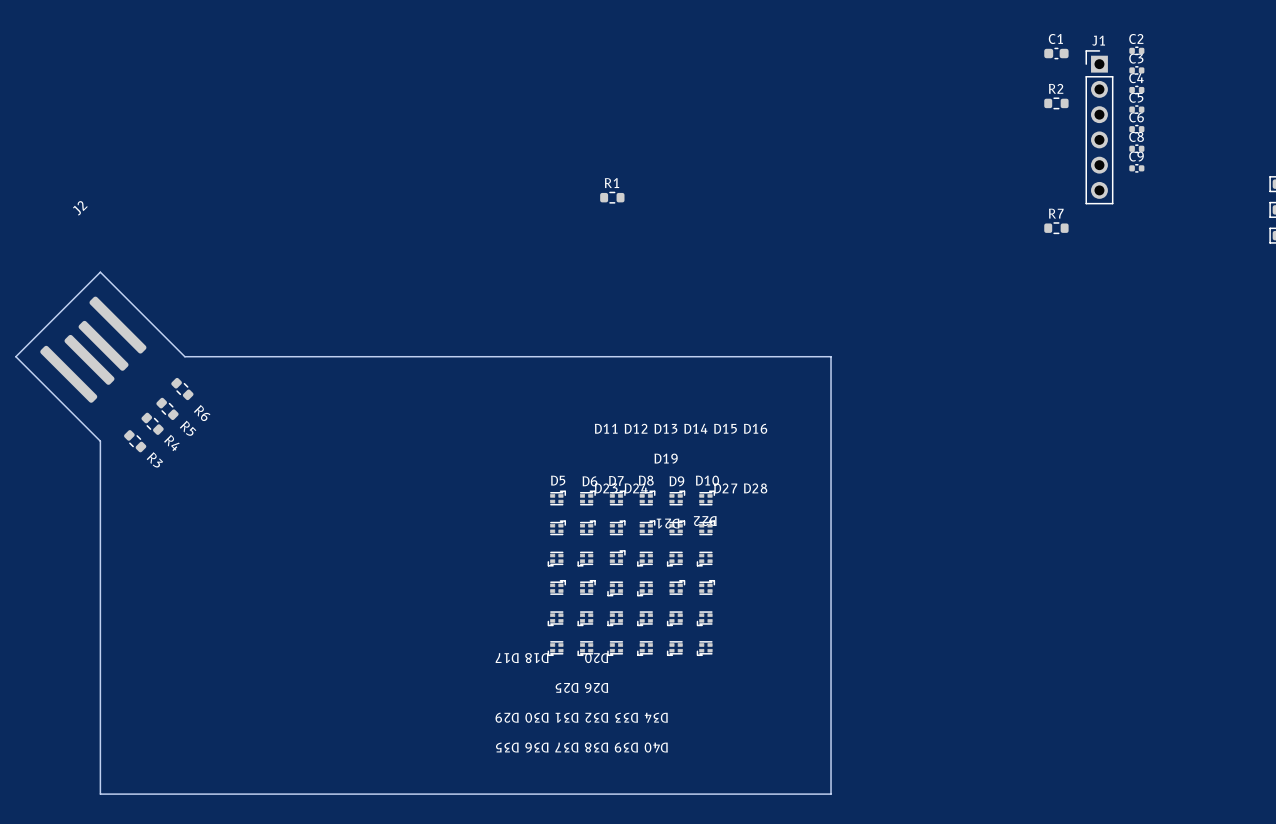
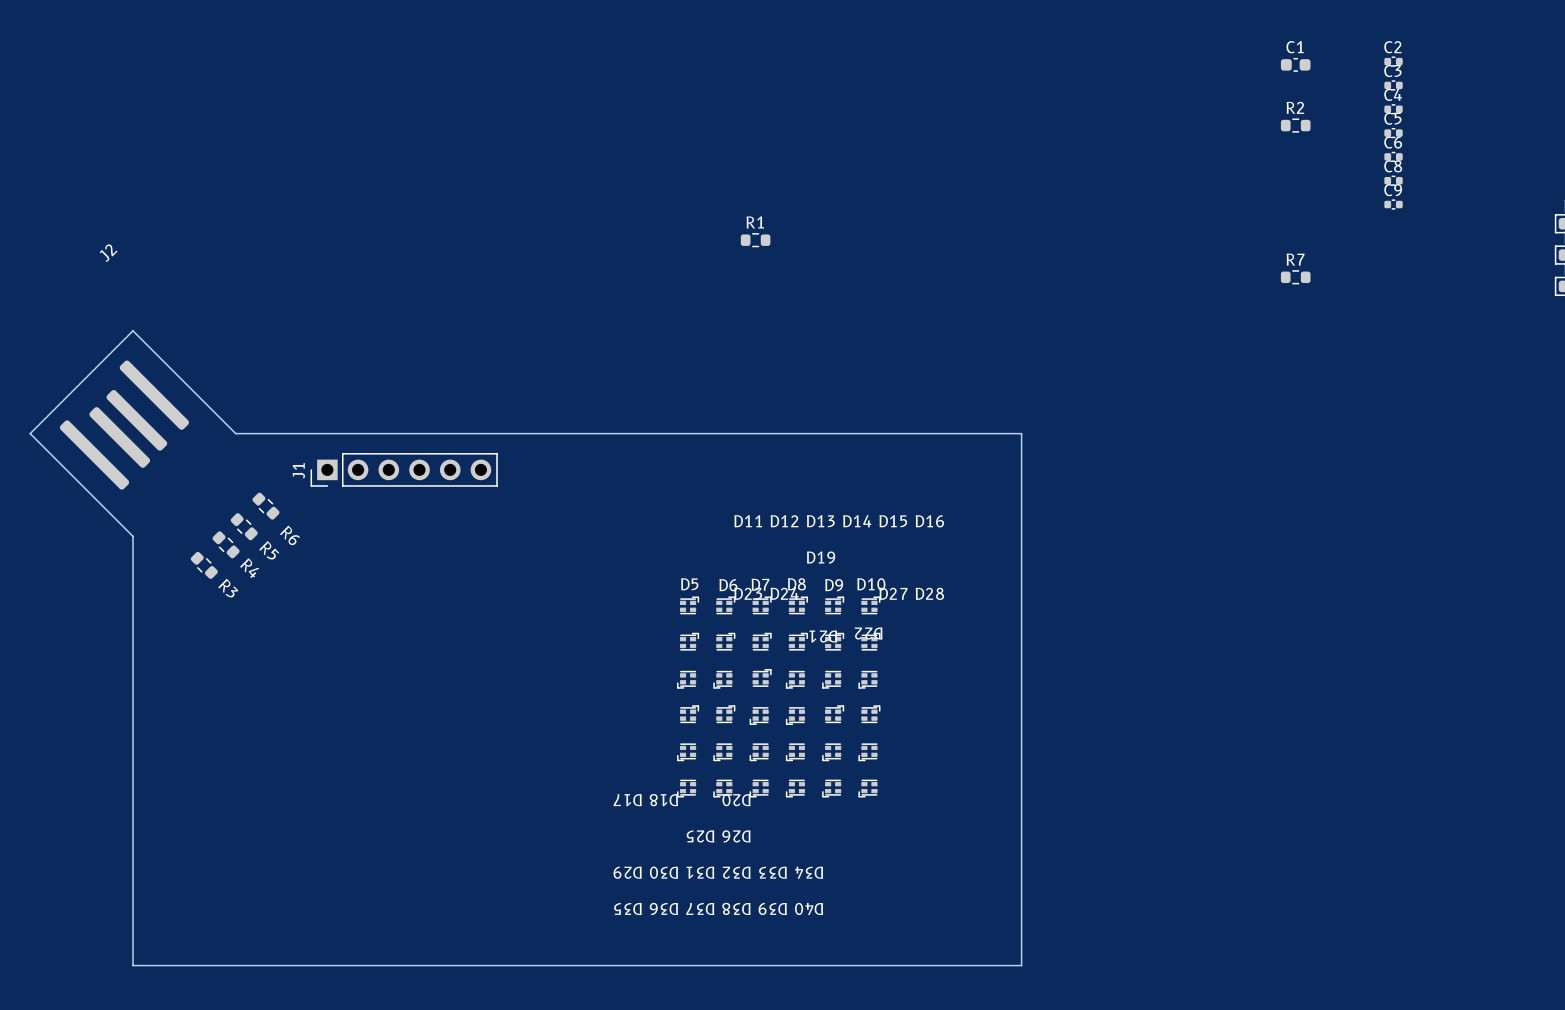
J1 rotation: 0° (1099, 127) -> 90° counterclockwise (404, 469)
J1 position: (1099, 127) -> (404, 469)
R6 position: (182, 389) -> (265, 506)
R5 position: (167, 408) -> (244, 526)
R4 position: (152, 423) -> (226, 544)
R3 position: (135, 441) -> (204, 565)

